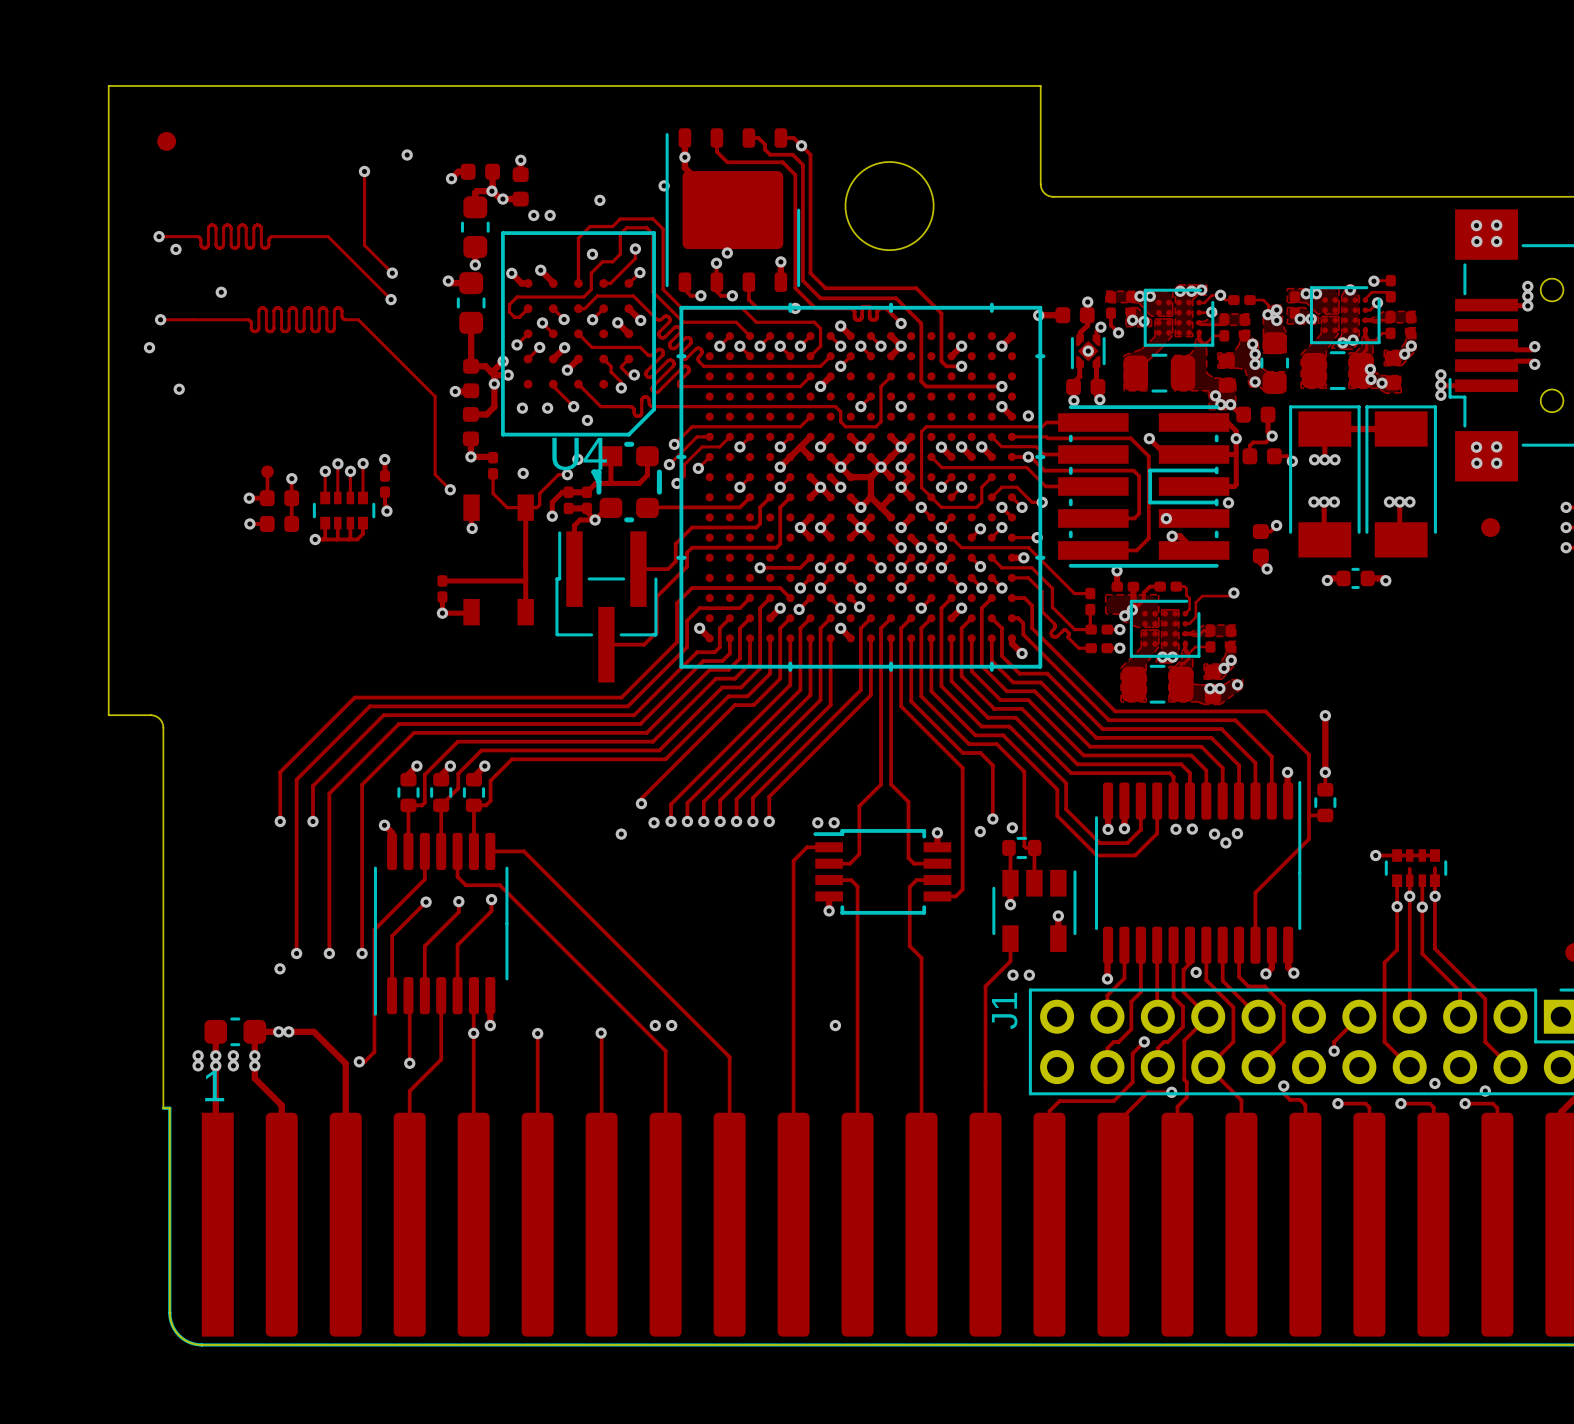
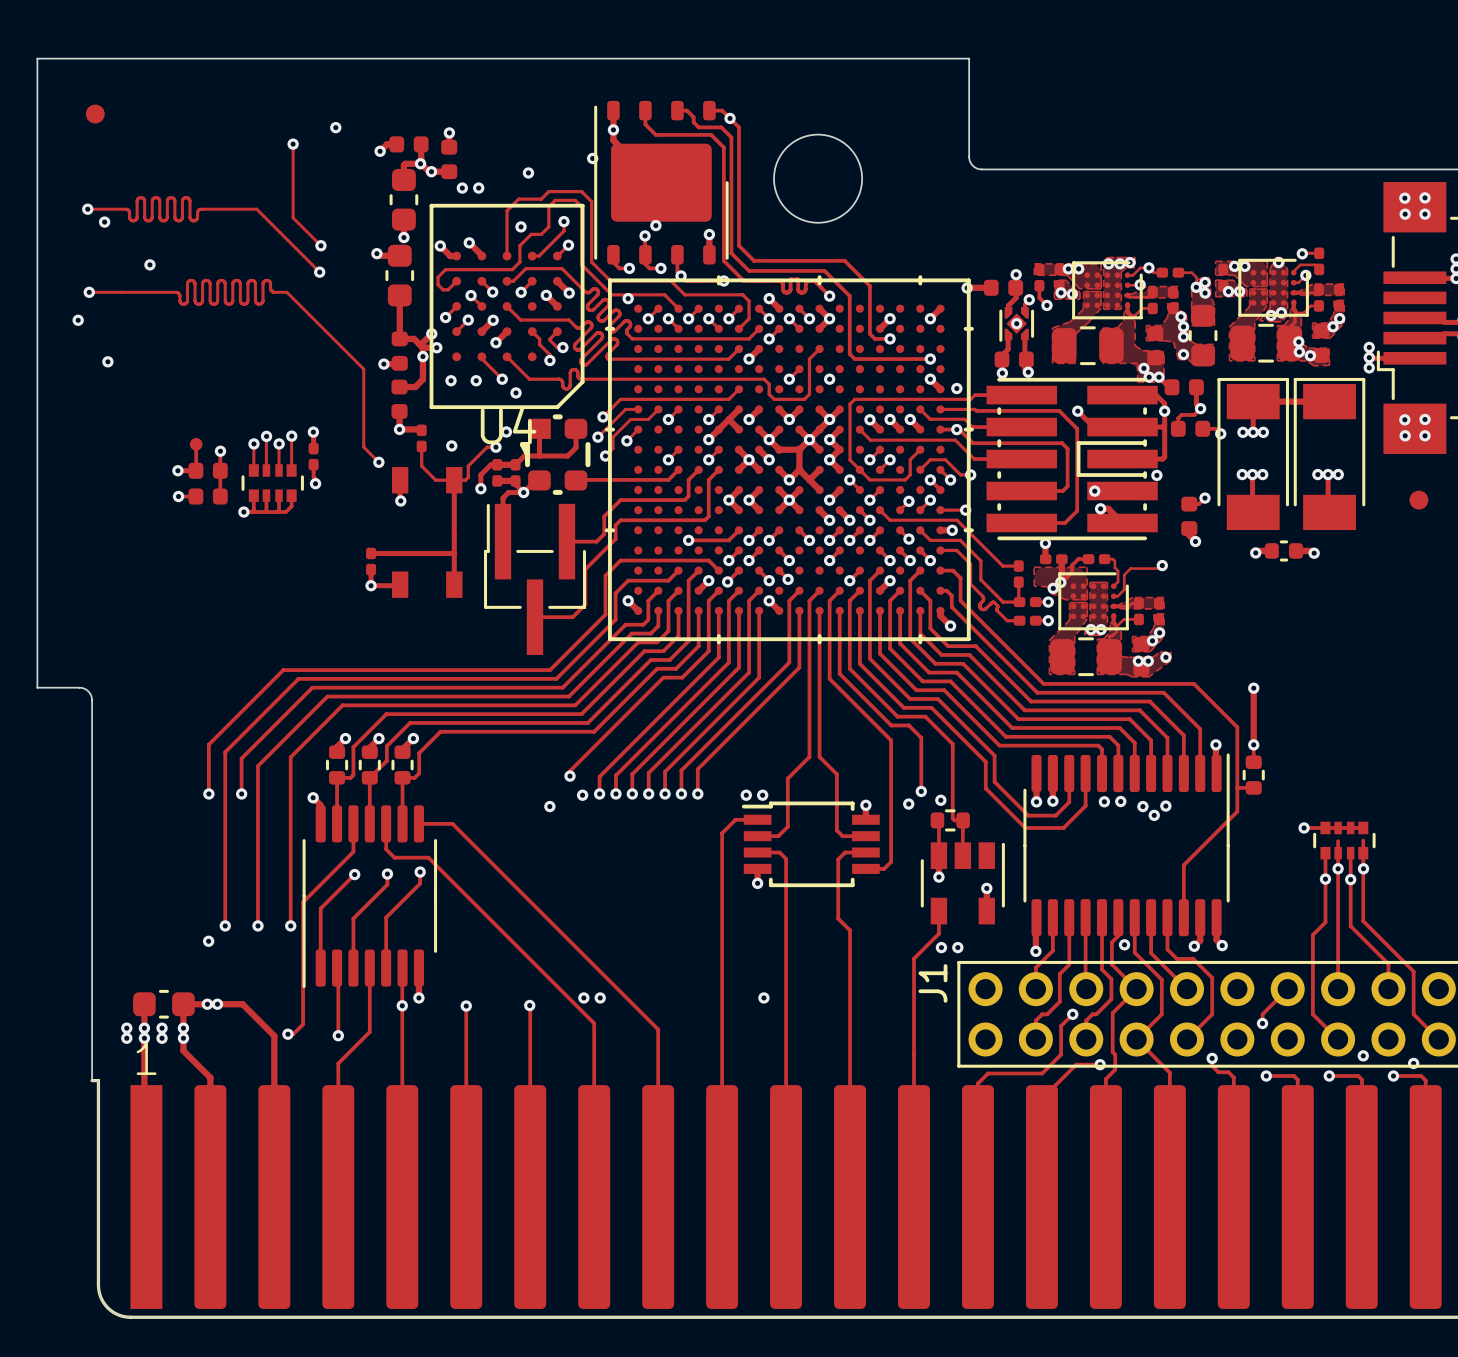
via: none -> (681, 275)
via: none -> (628, 298)

